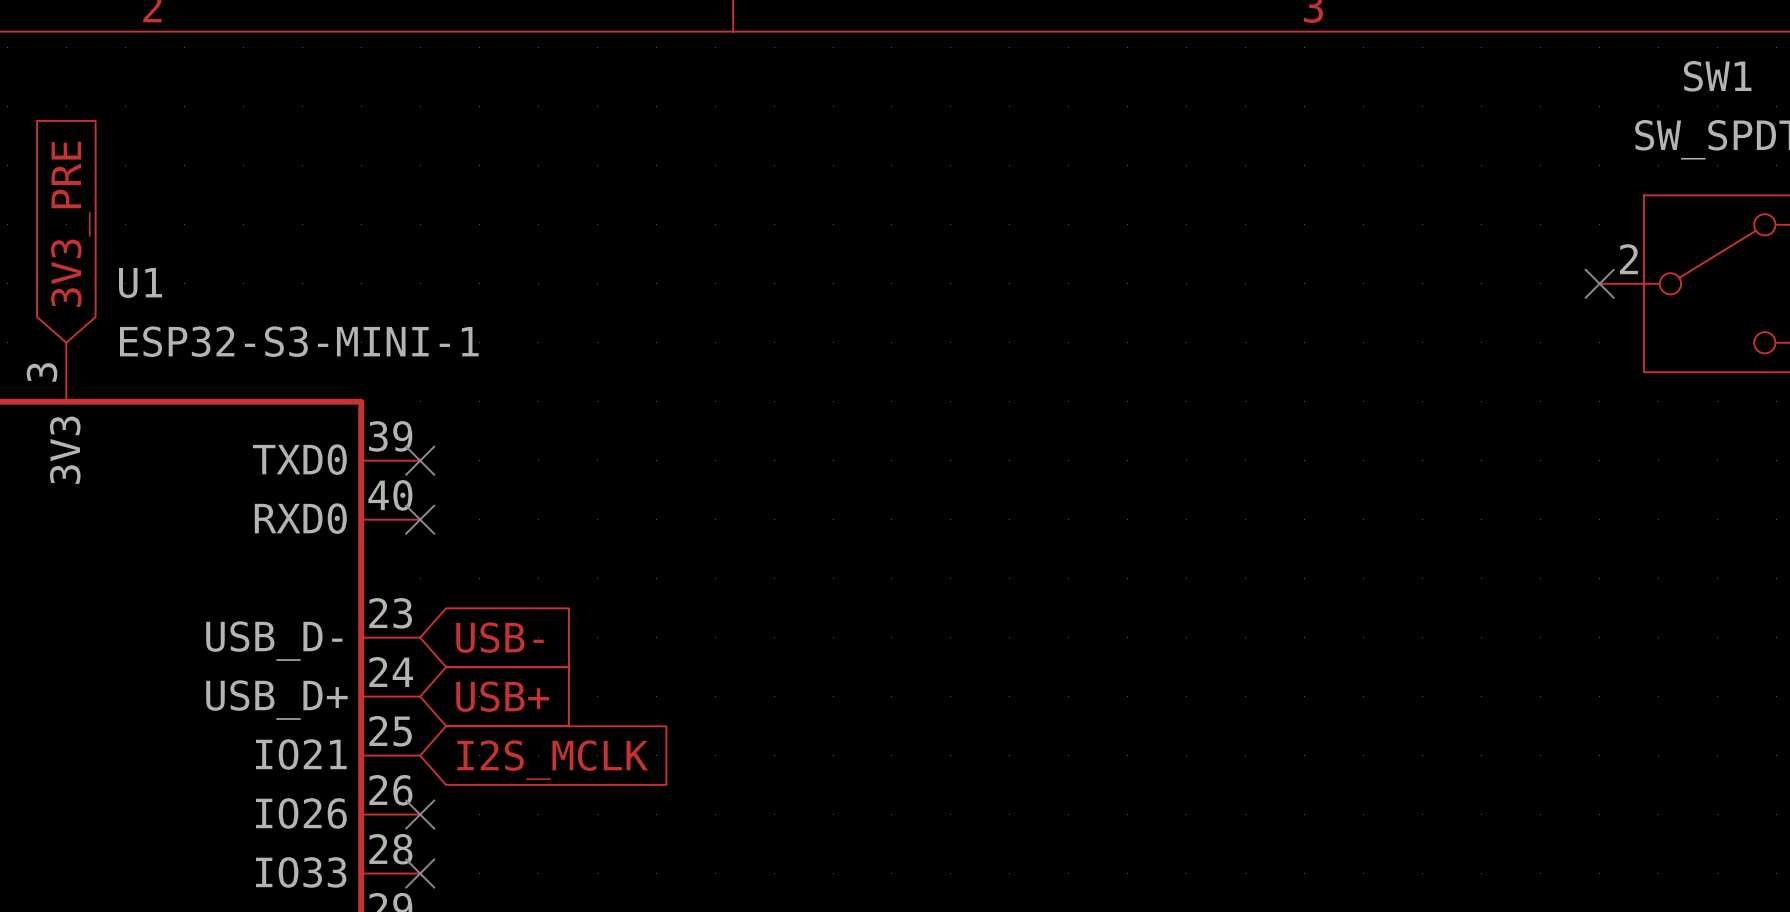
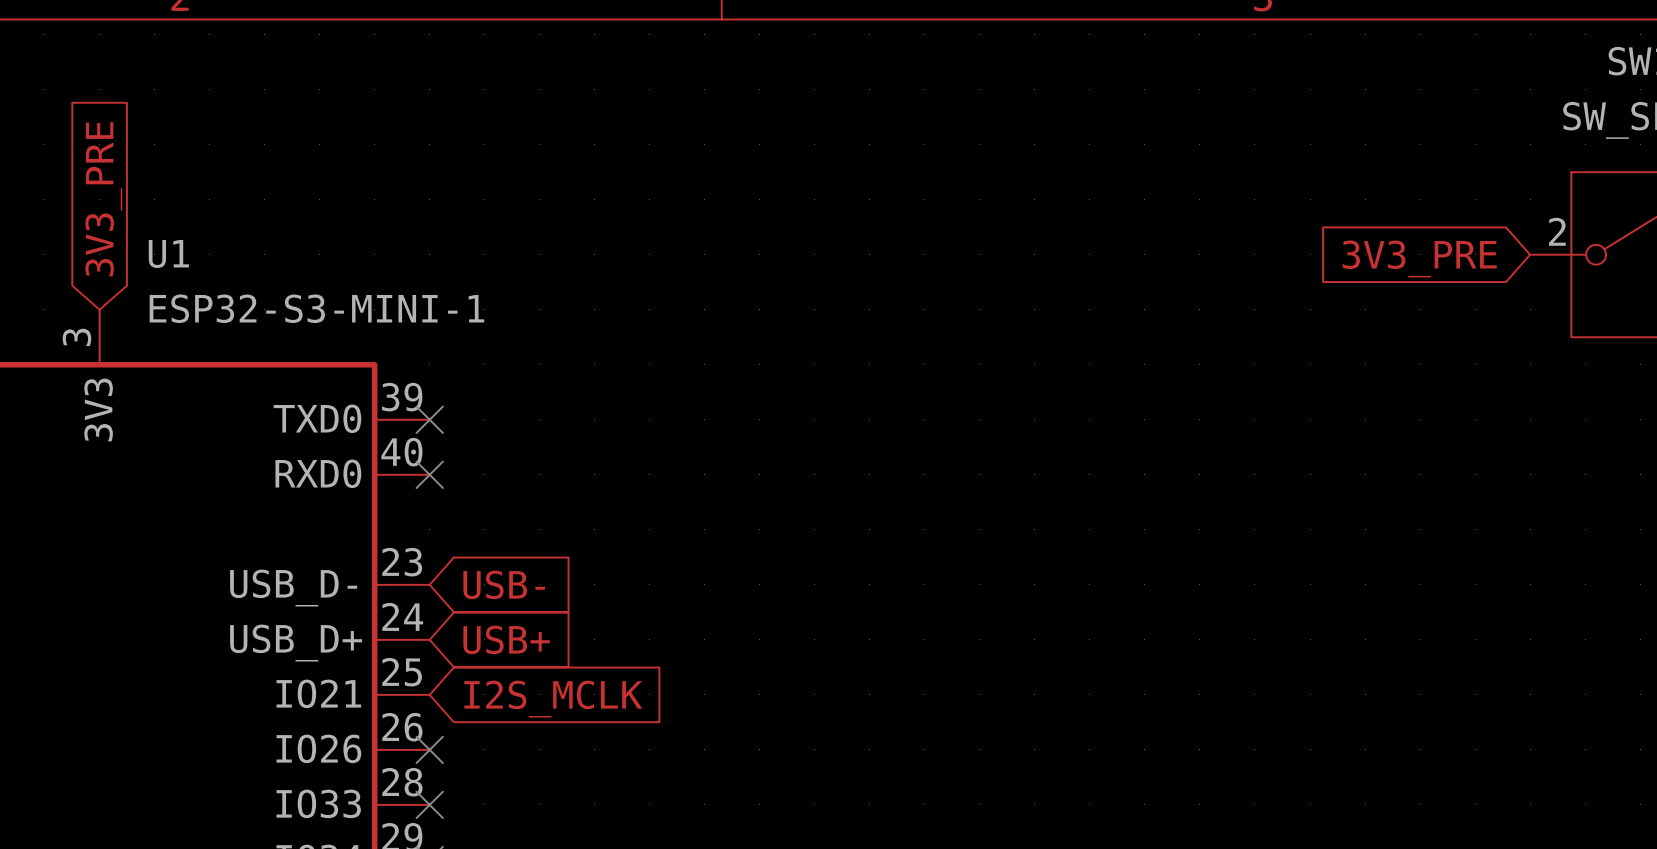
no-connect mark: (1599, 283) -> none
global label: none -> 3V3_PRE (1419, 258)

